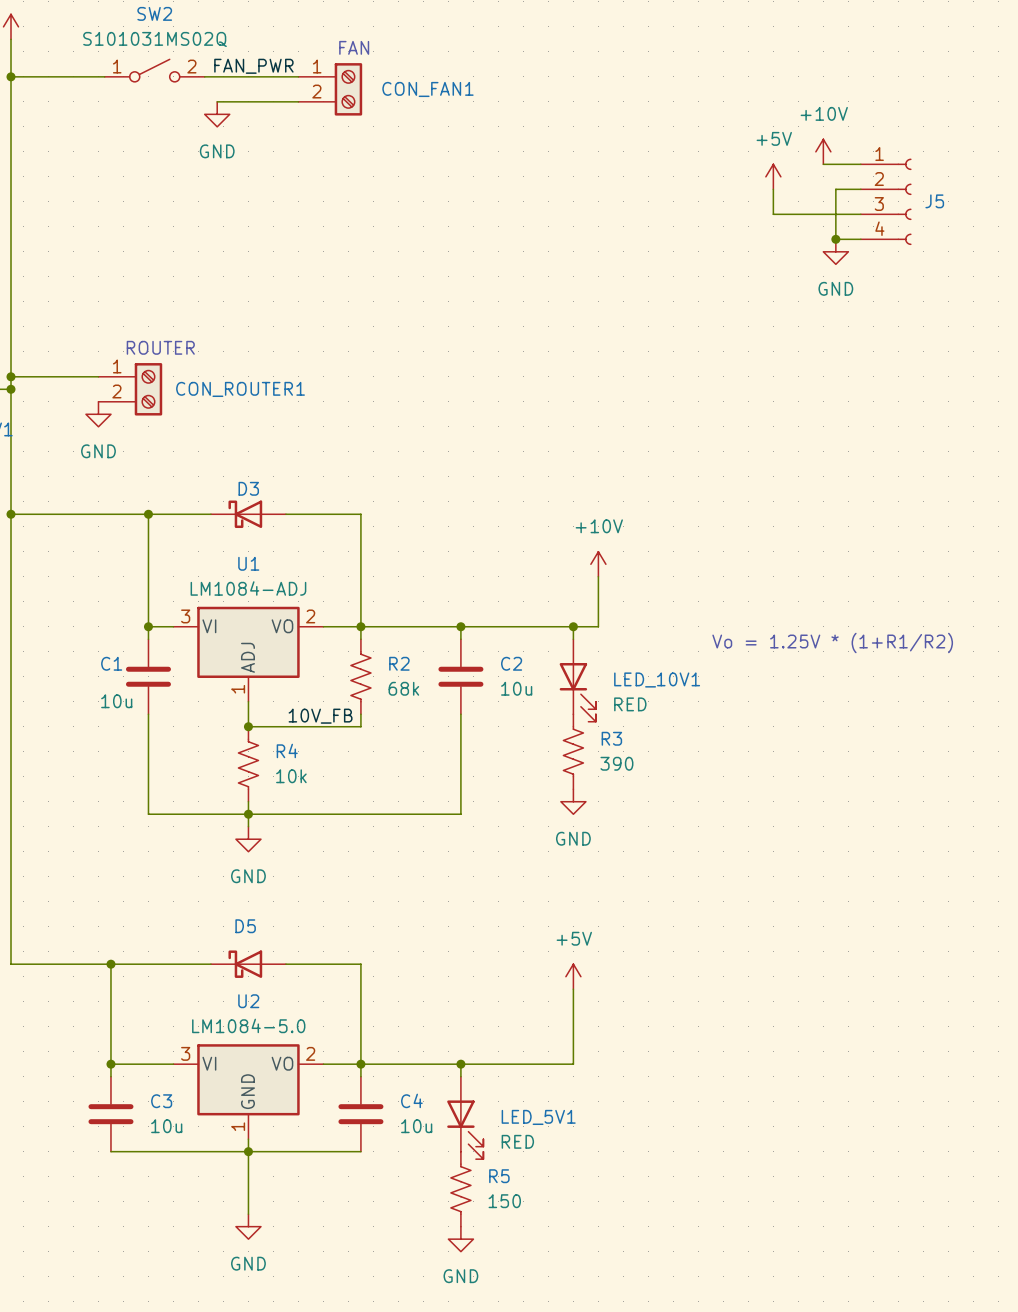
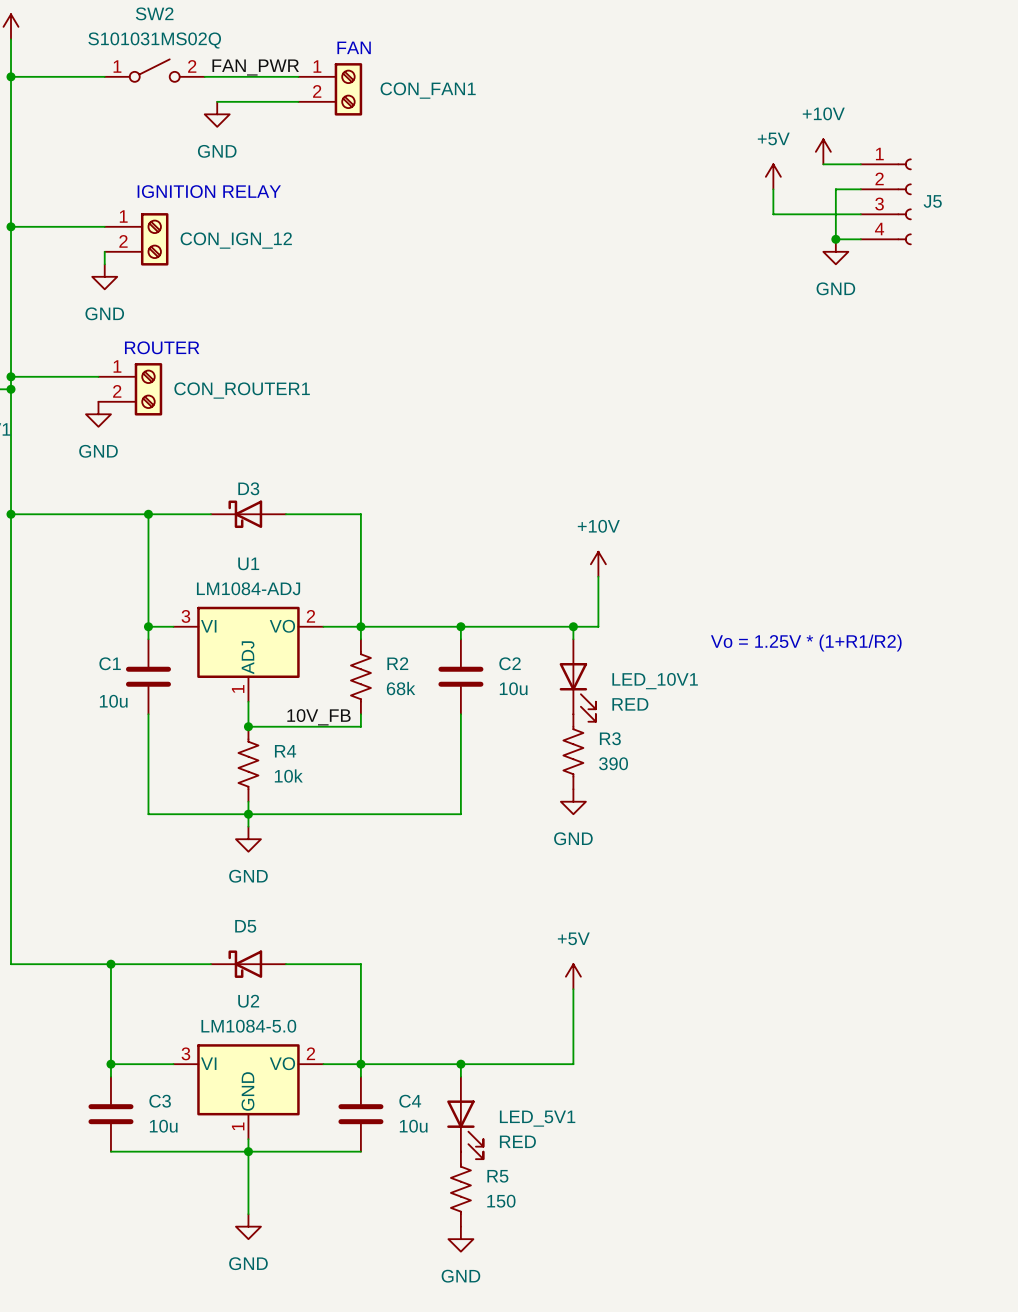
text: none -> IGNITION RELAY (209, 191)
wire: none -> (10, 226) (104, 226)
junction: none -> (10, 226)
CON_IGN_12: none -> (136, 239)
wire: none -> (104, 251) (104, 264)
power symbol: none -> GND (104, 276)

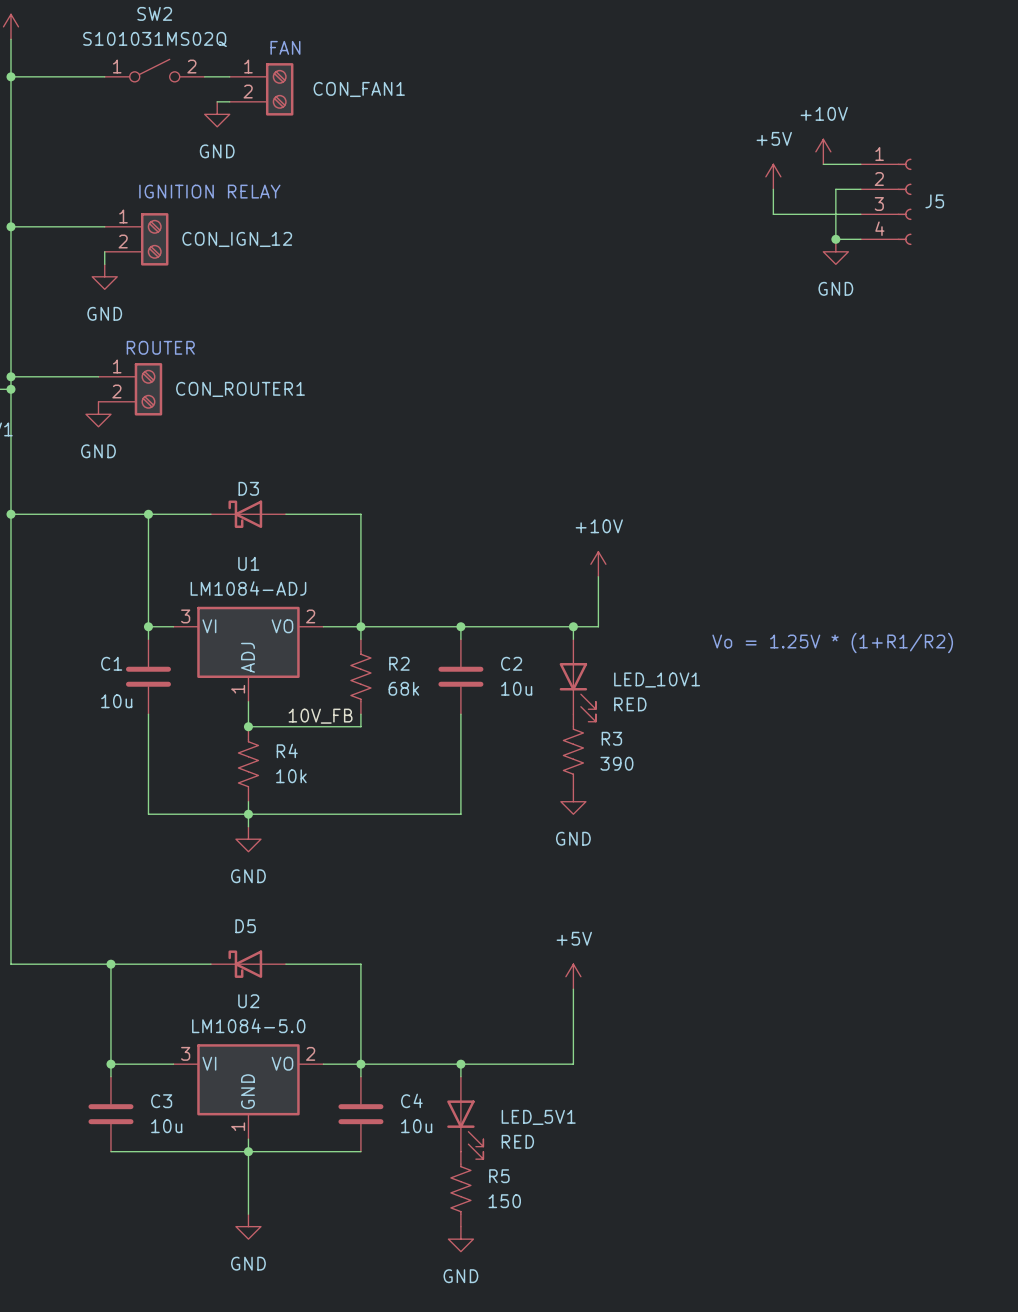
text position: FAN (354, 47) -> FAN (285, 47)
label: FAN_PWR (255, 67) -> none
CON_FAN1 position: (330, 89) -> (261, 89)

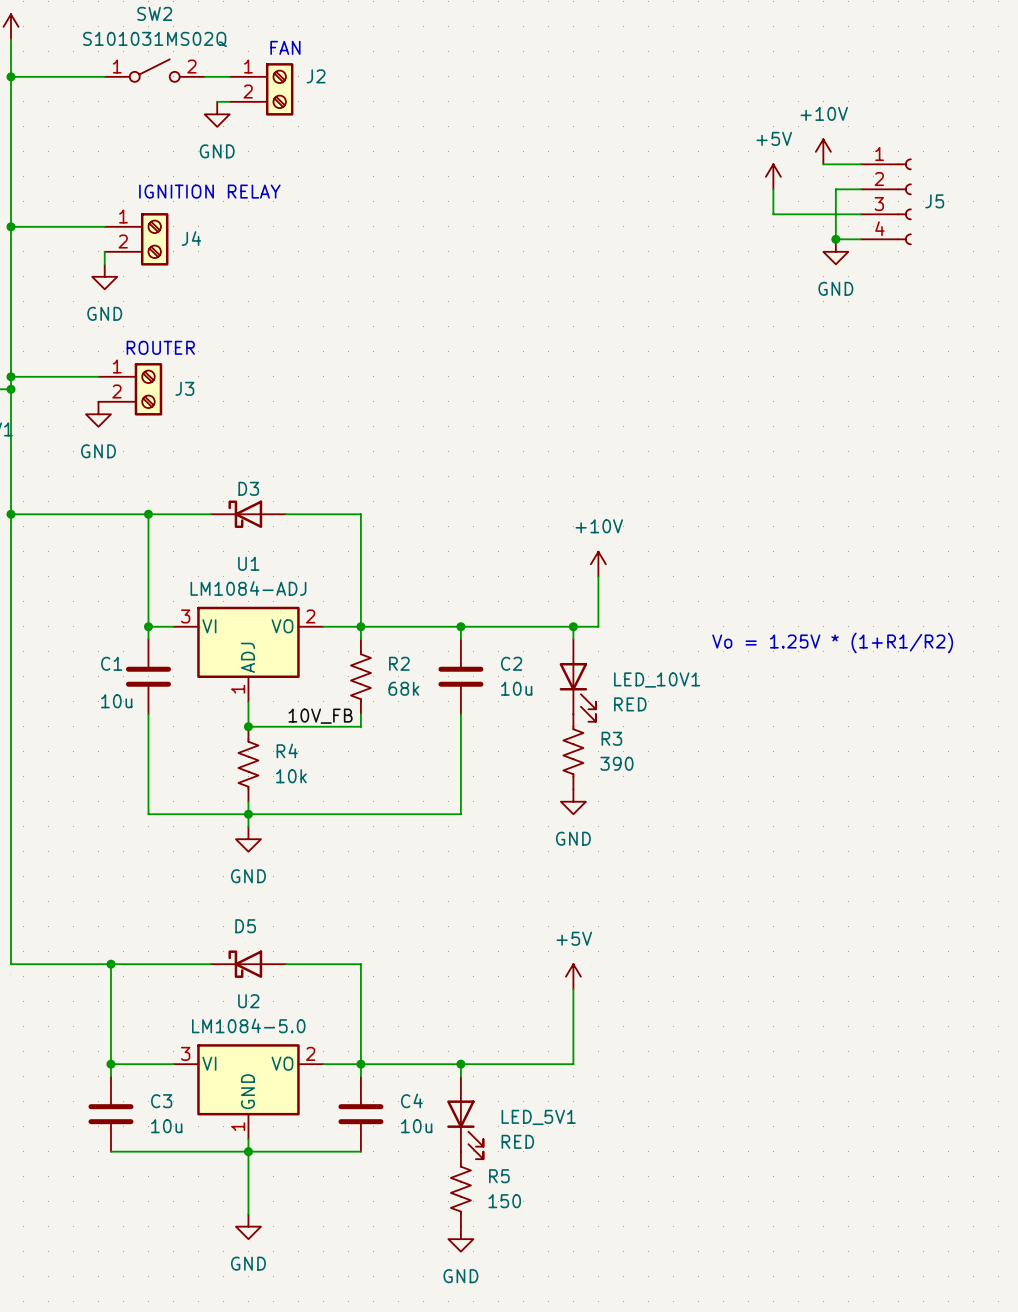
CON_FAN1 name: CON_FAN1 (359, 89) -> J2 (316, 76)
CON_IGN_12 name: CON_IGN_12 (237, 239) -> J4 (191, 238)
CON_ROUTER1 name: CON_ROUTER1 (240, 389) -> J3 (184, 388)

